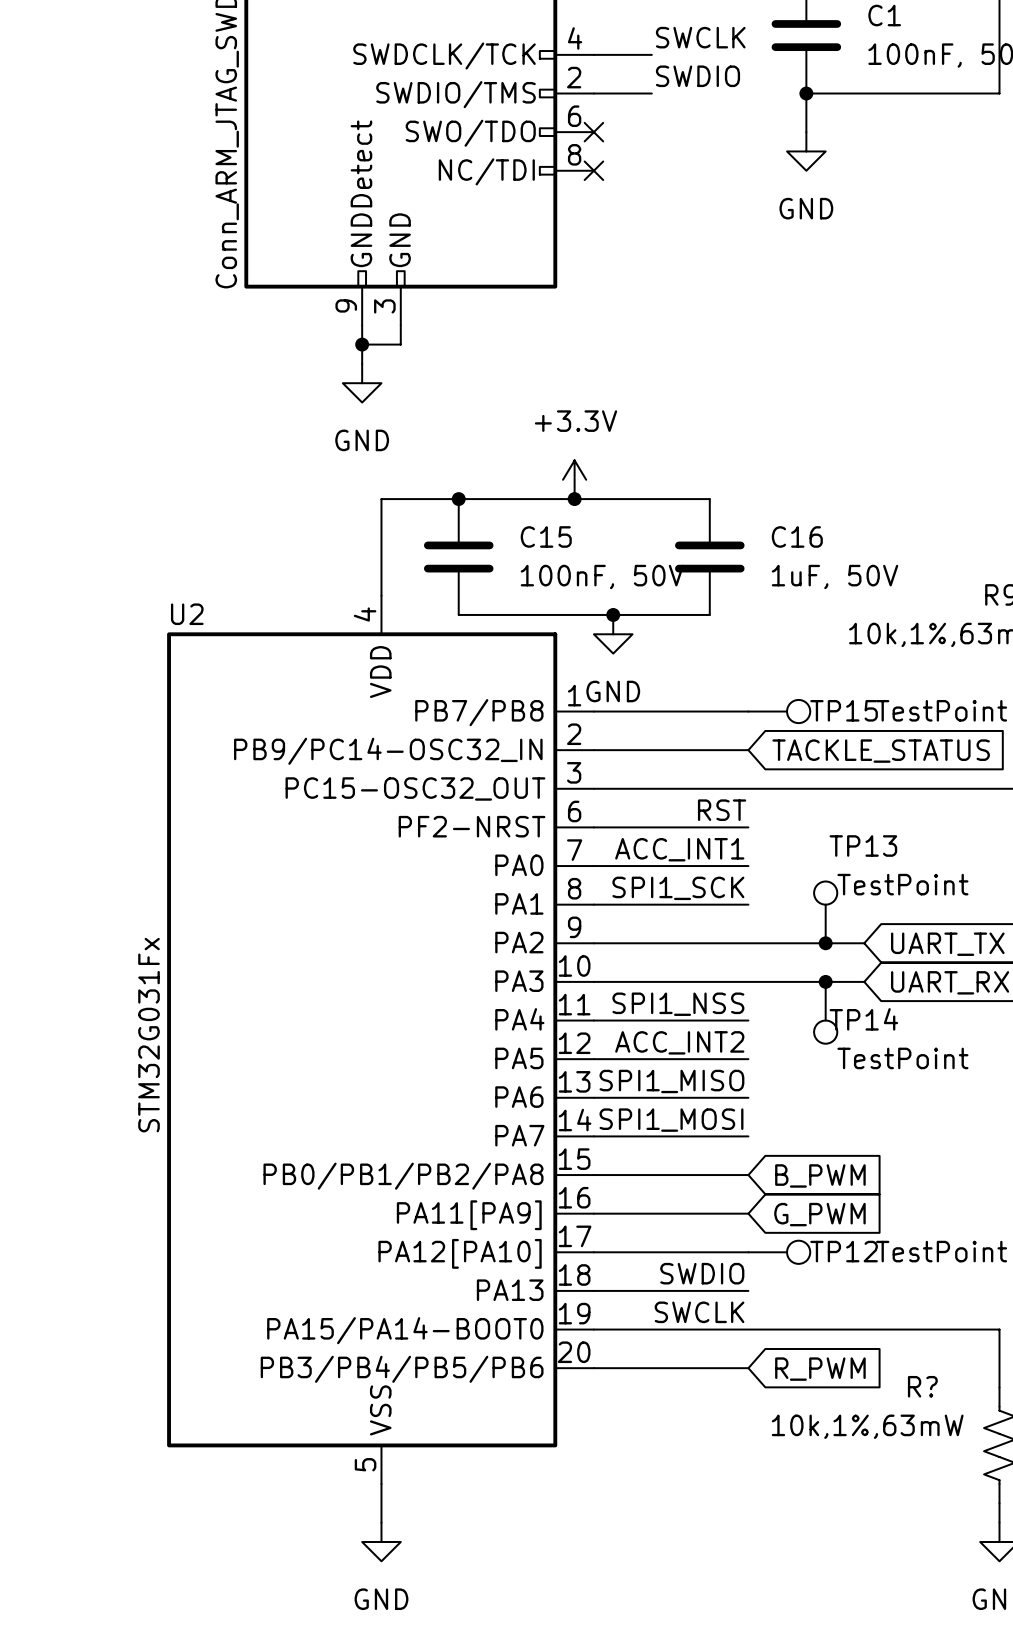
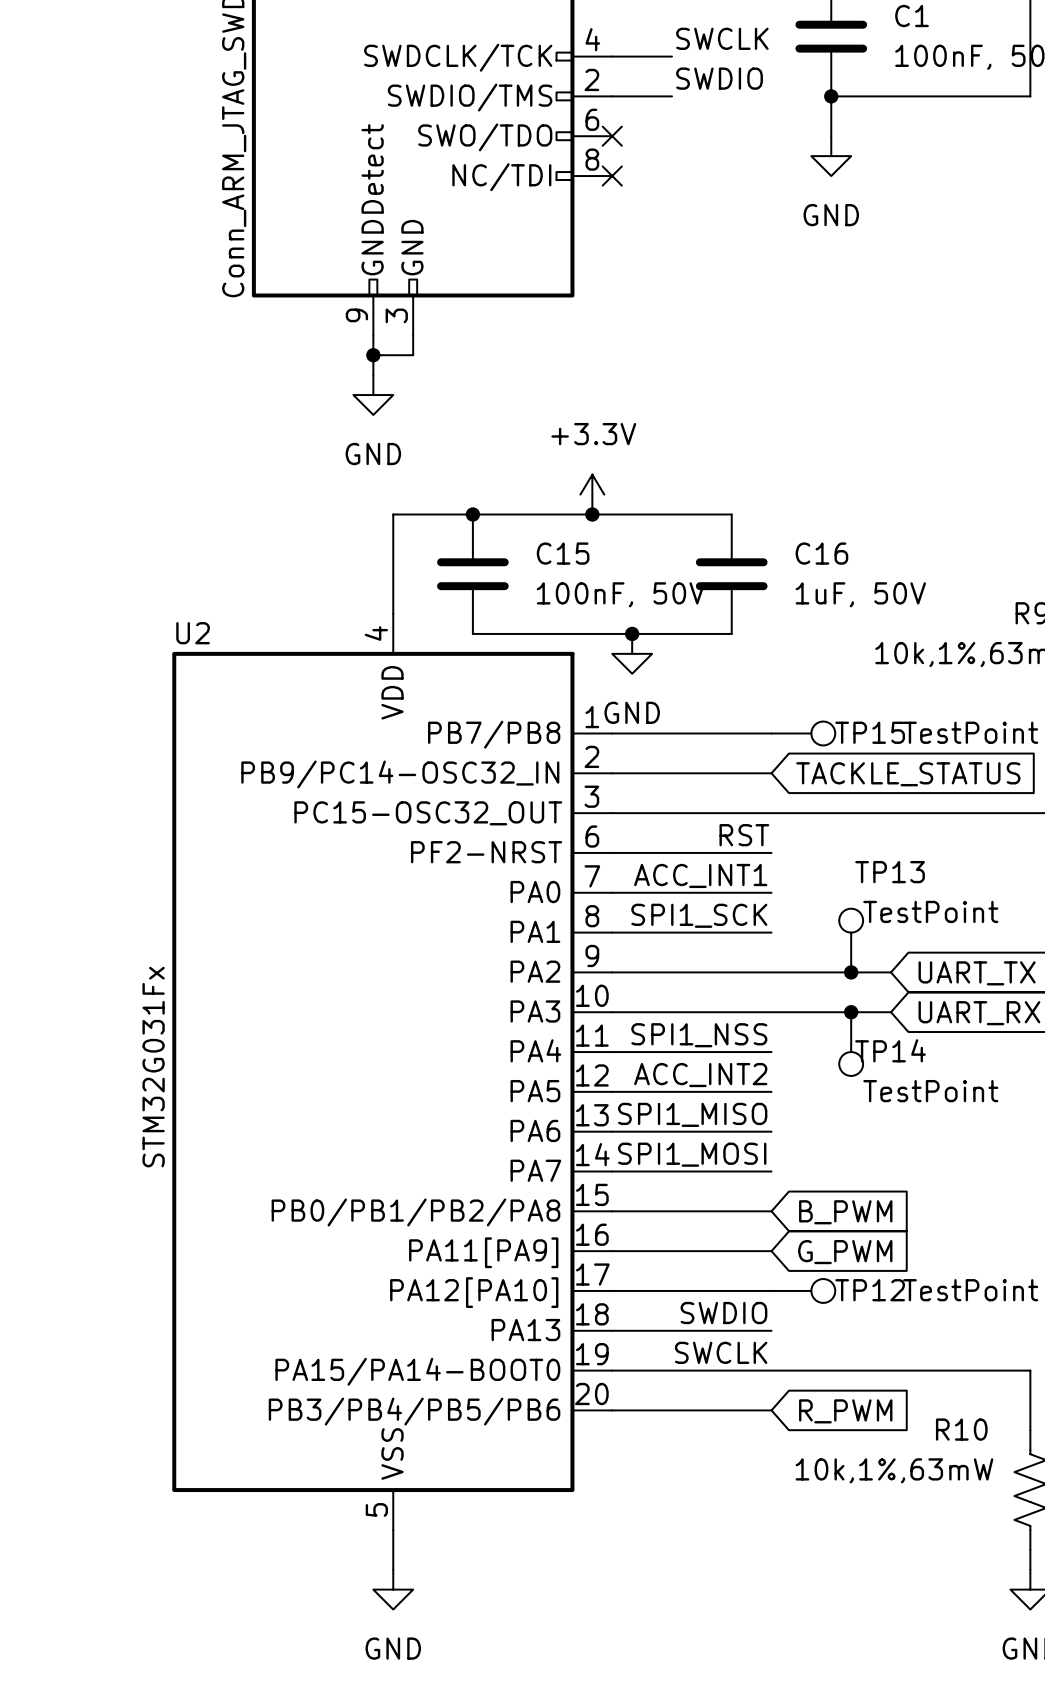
R? name: R? (922, 1386) -> R10 (961, 1429)

